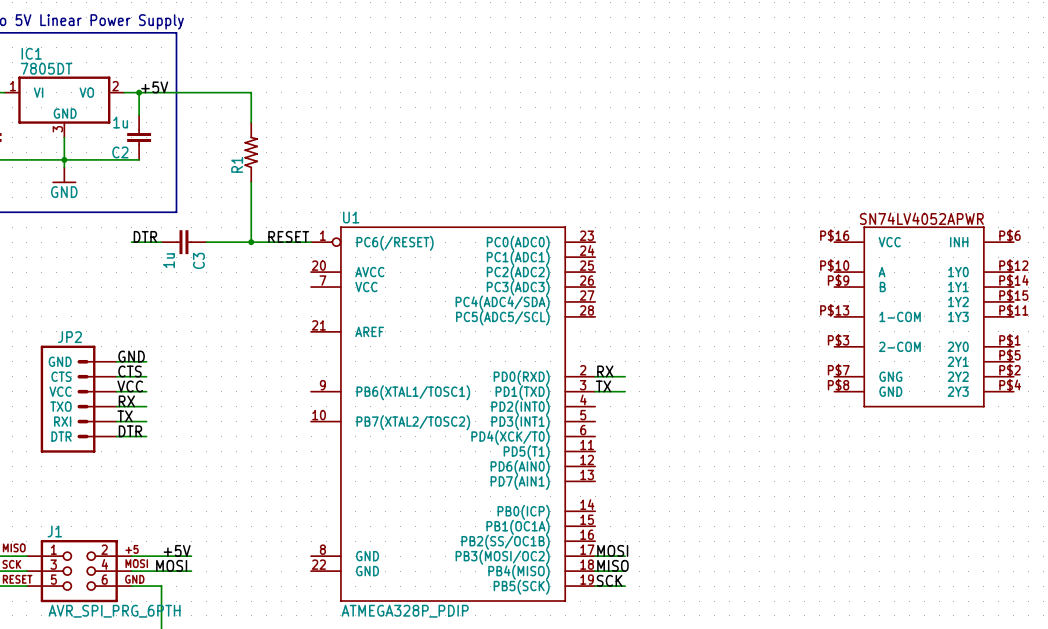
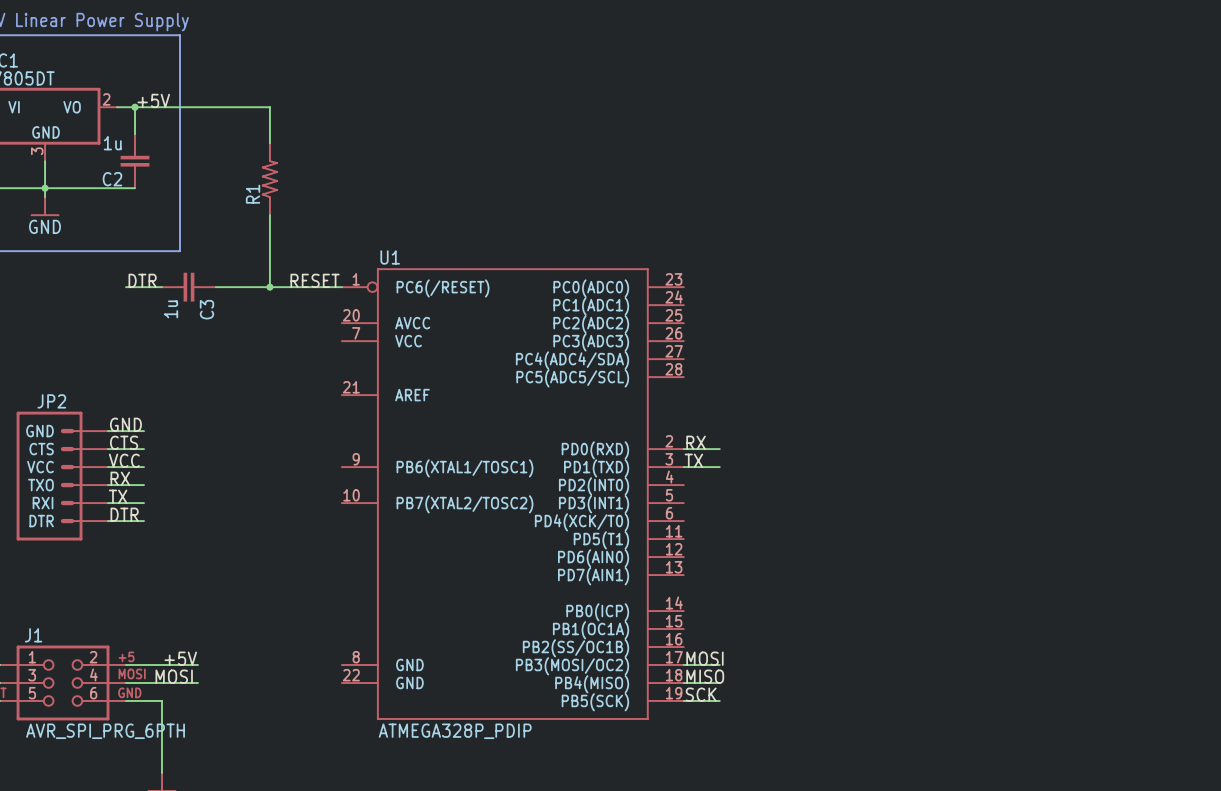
part: (924, 316) -> none

